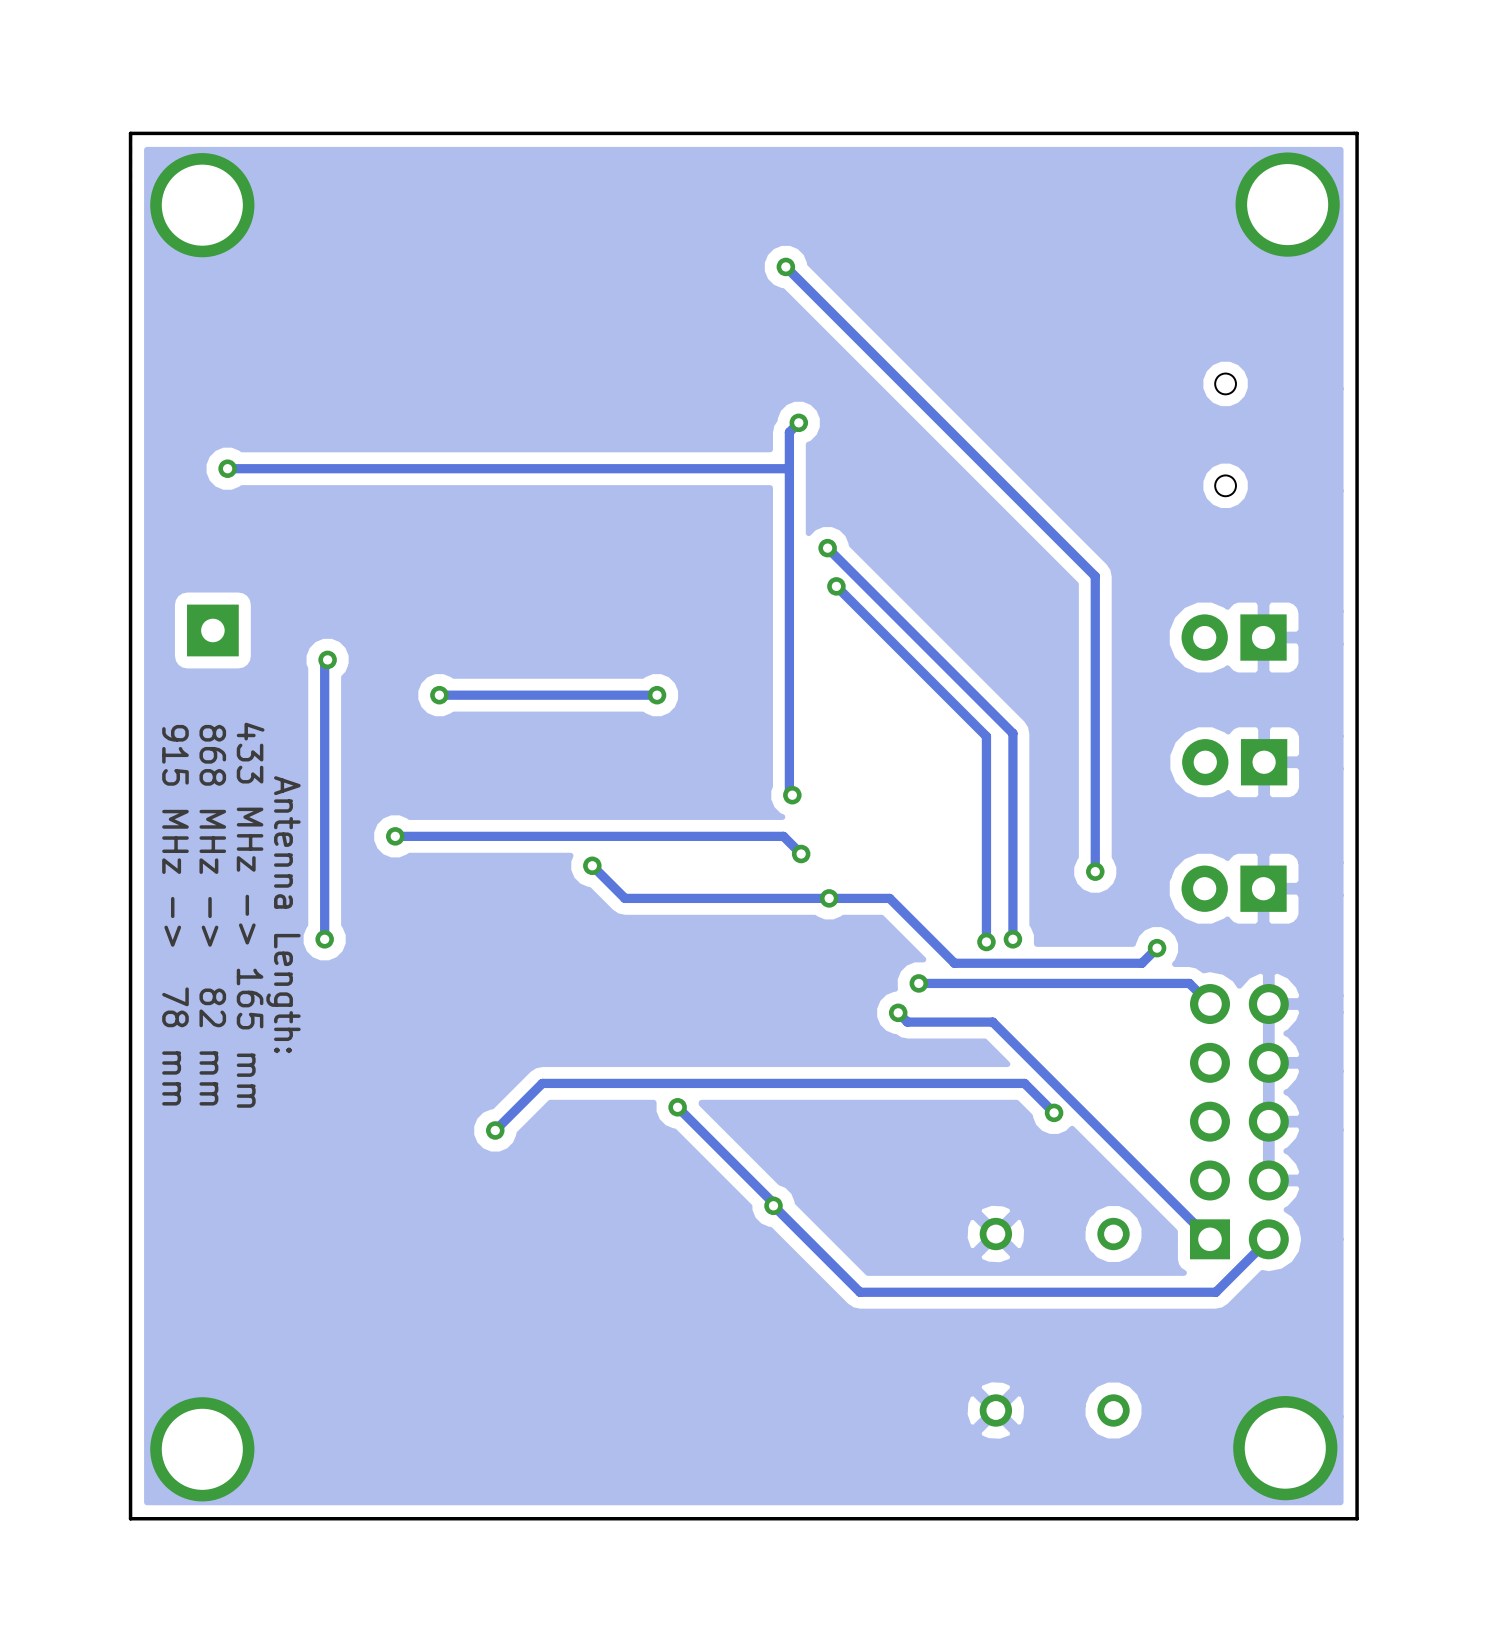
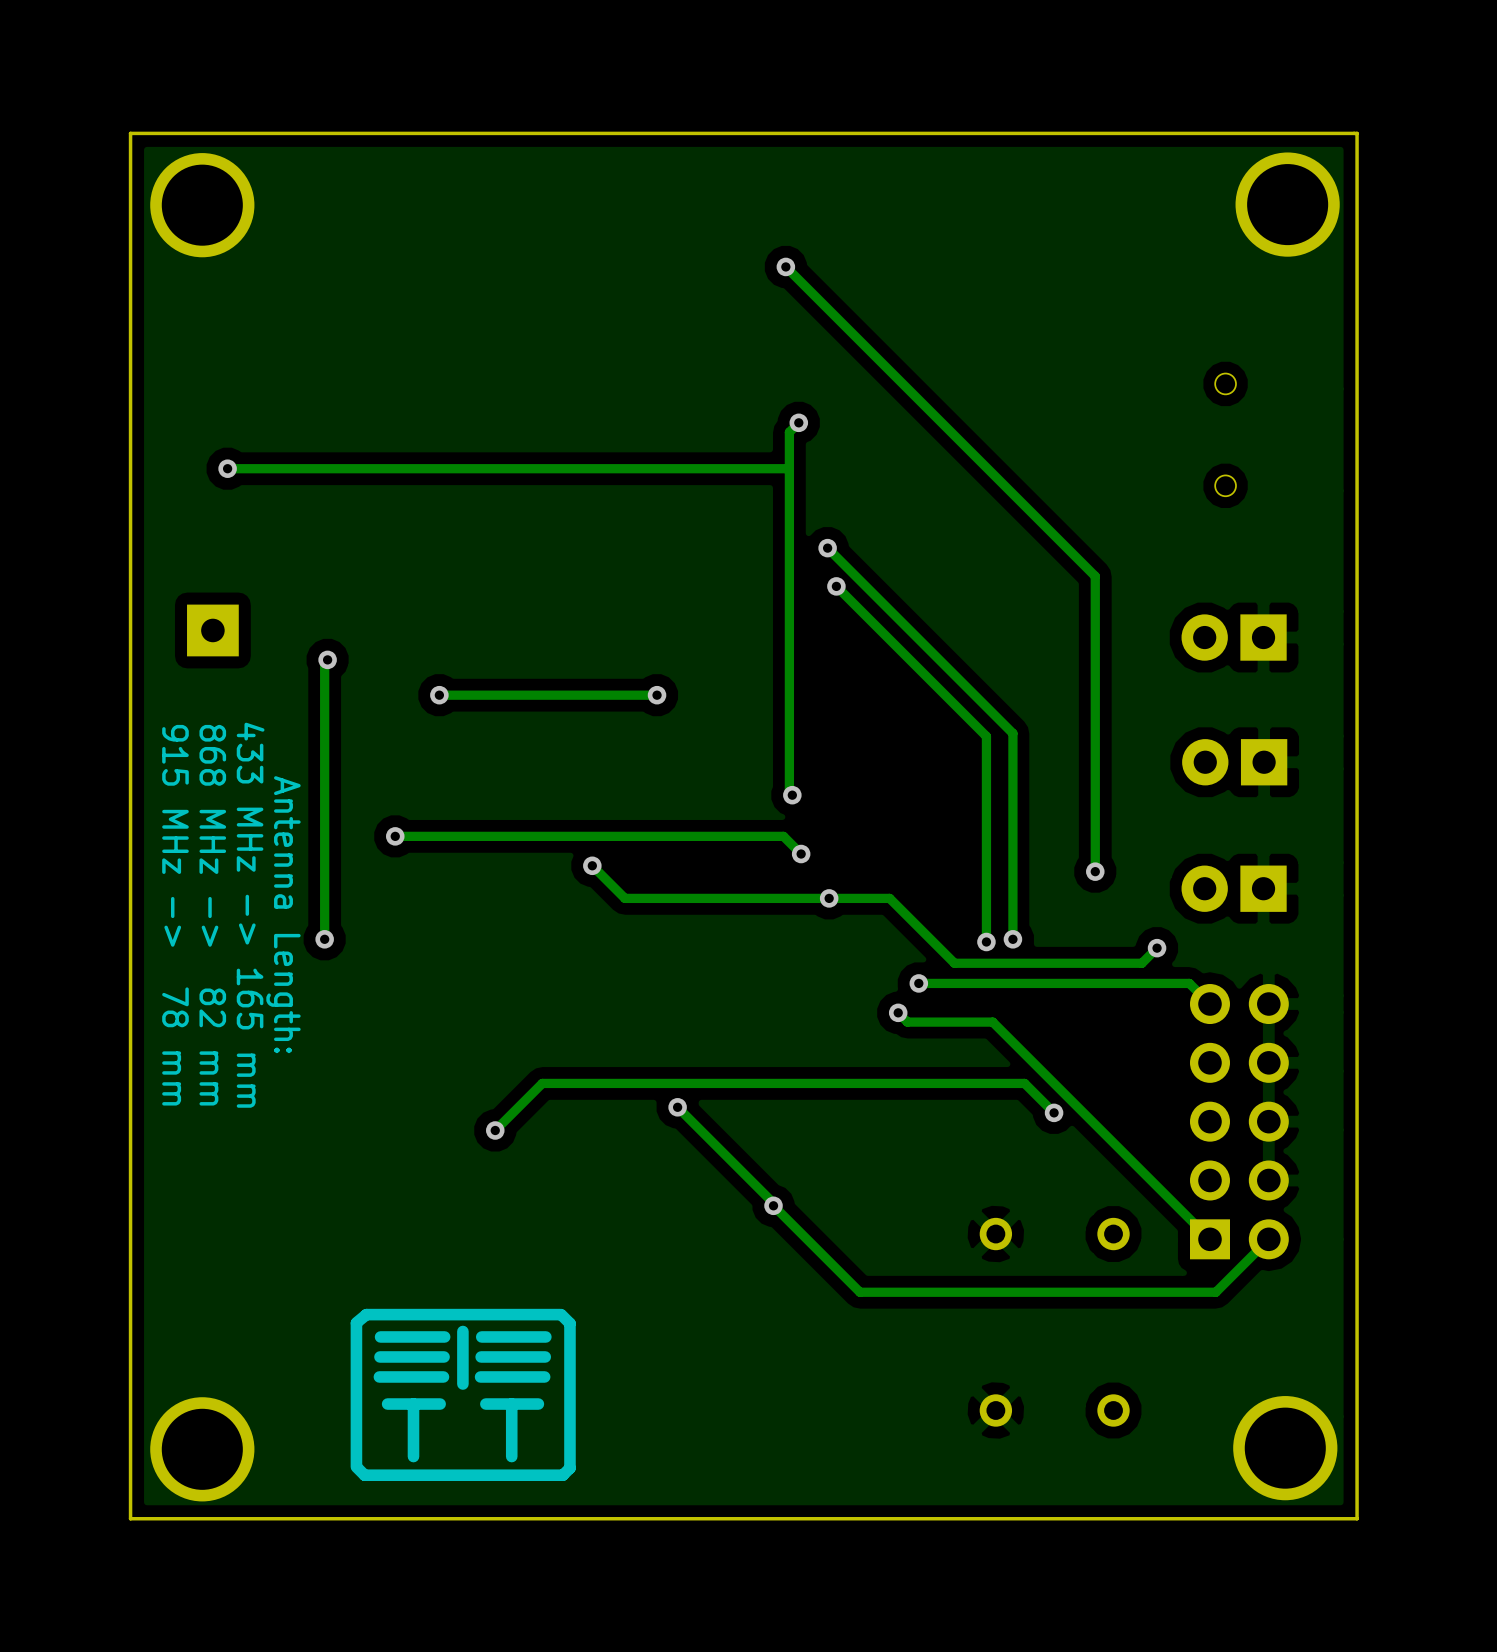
drawing: none -> [350, 1308, 576, 1482]

